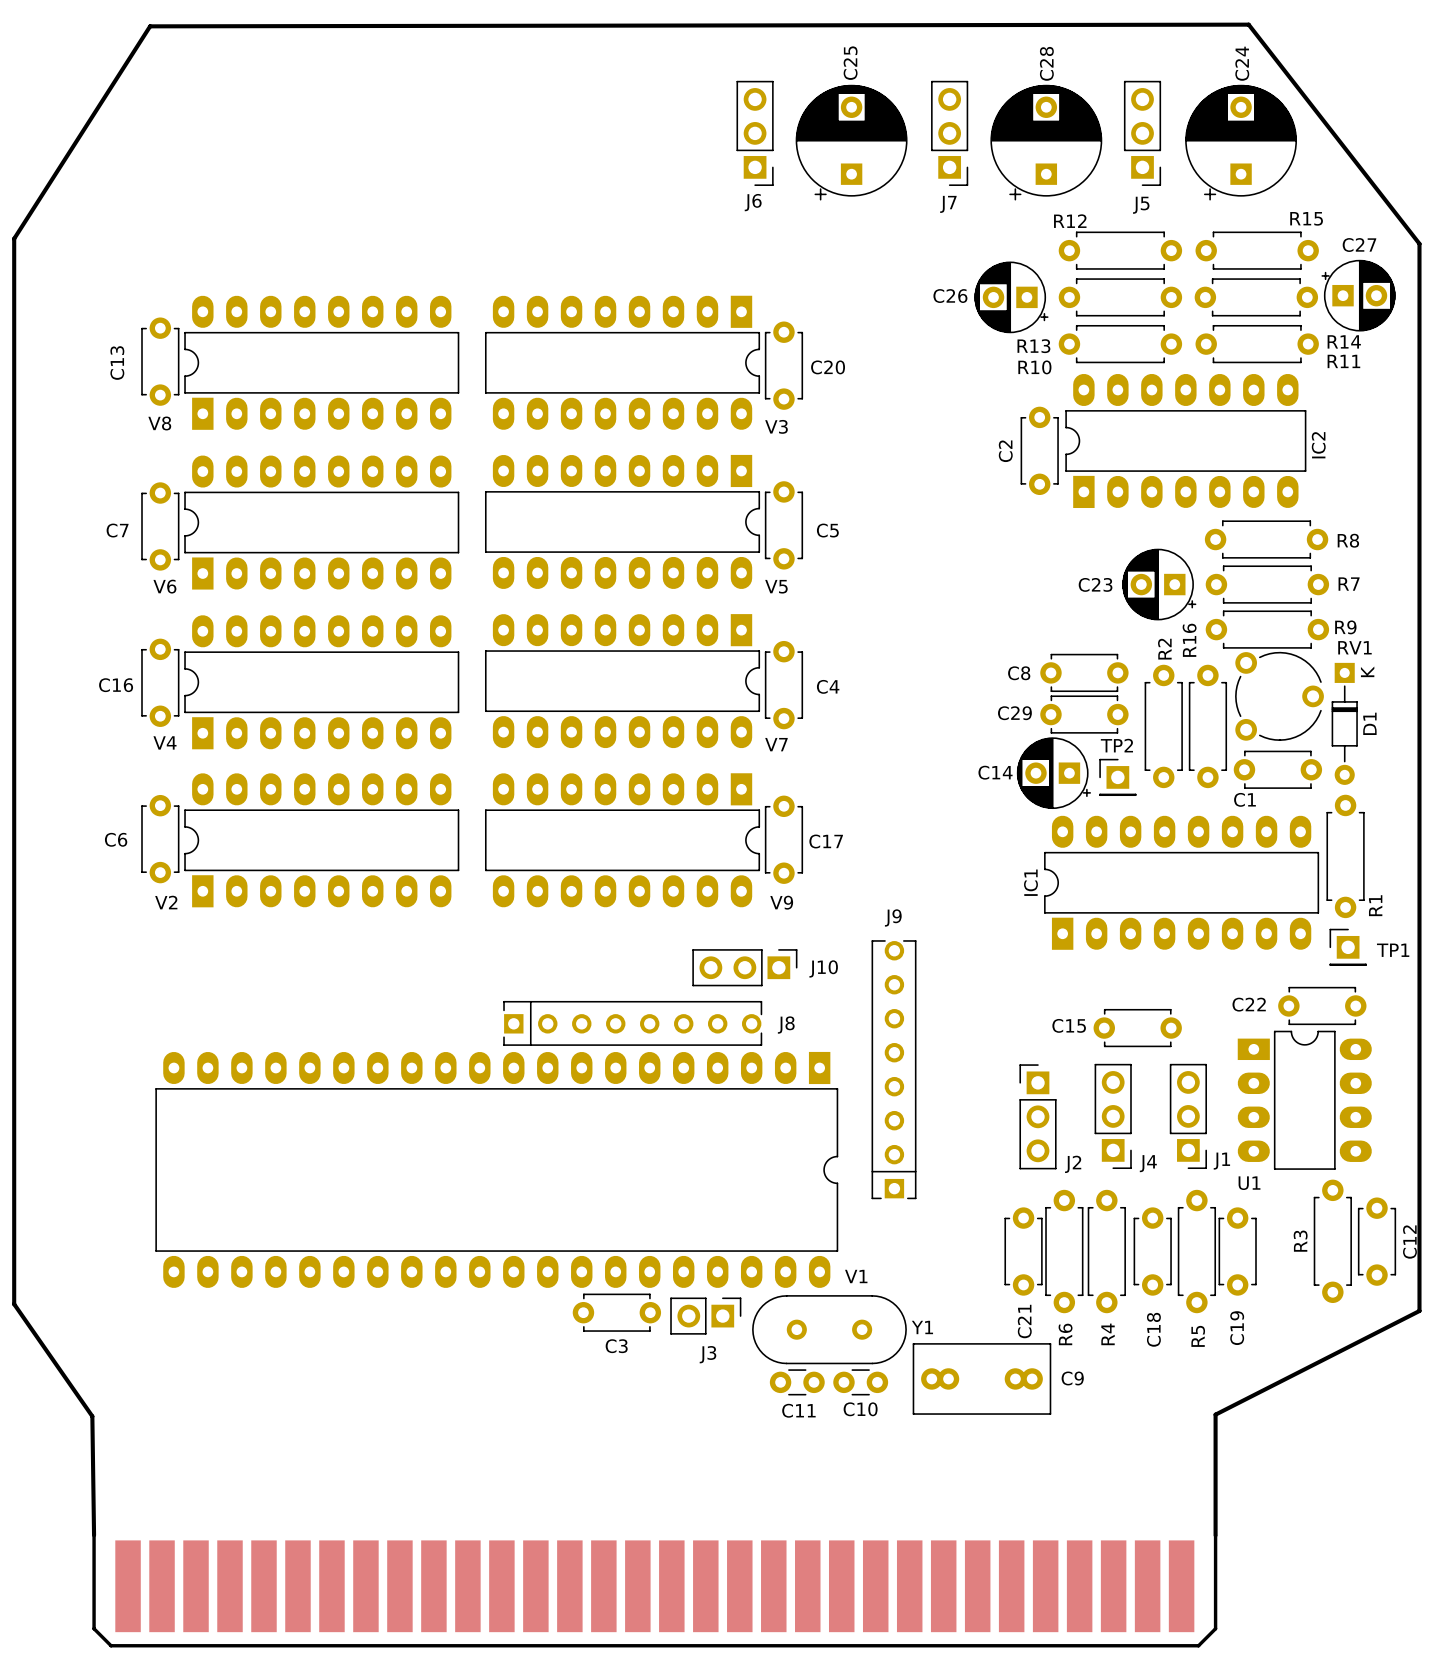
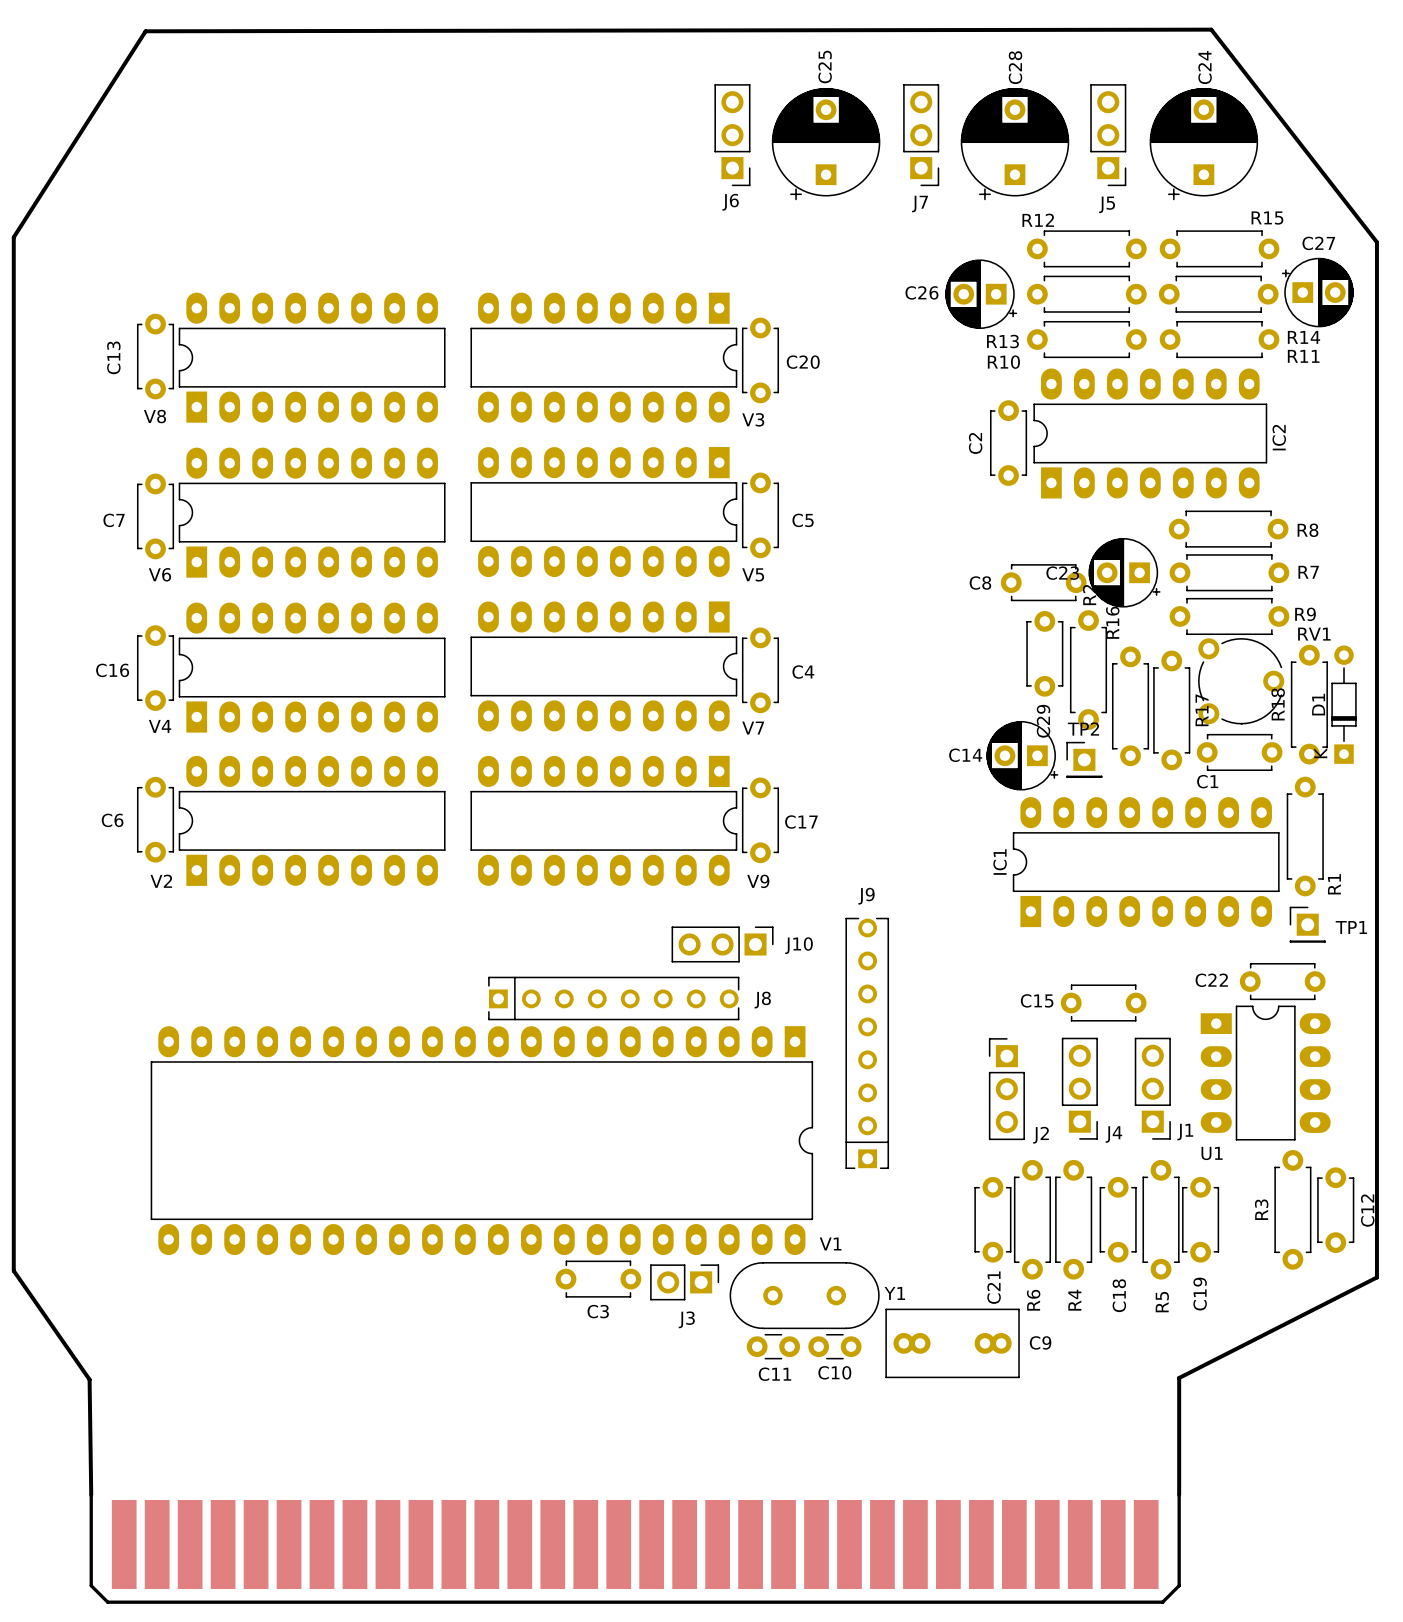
R16 name: R16 (1189, 640) -> R17 (1202, 710)
C8 position: (1084, 672) -> (1043, 582)
C29 name position: C29 (1014, 713) -> C29 (1043, 721)
C29 rotation: 0° (1084, 714) -> 90° clockwise (1044, 653)
R18: none -> (1309, 704)
R16: none -> (1130, 706)
D1 rotation: 0° (1344, 723) -> 180° (1344, 704)
R2 position: (1163, 726) -> (1088, 670)

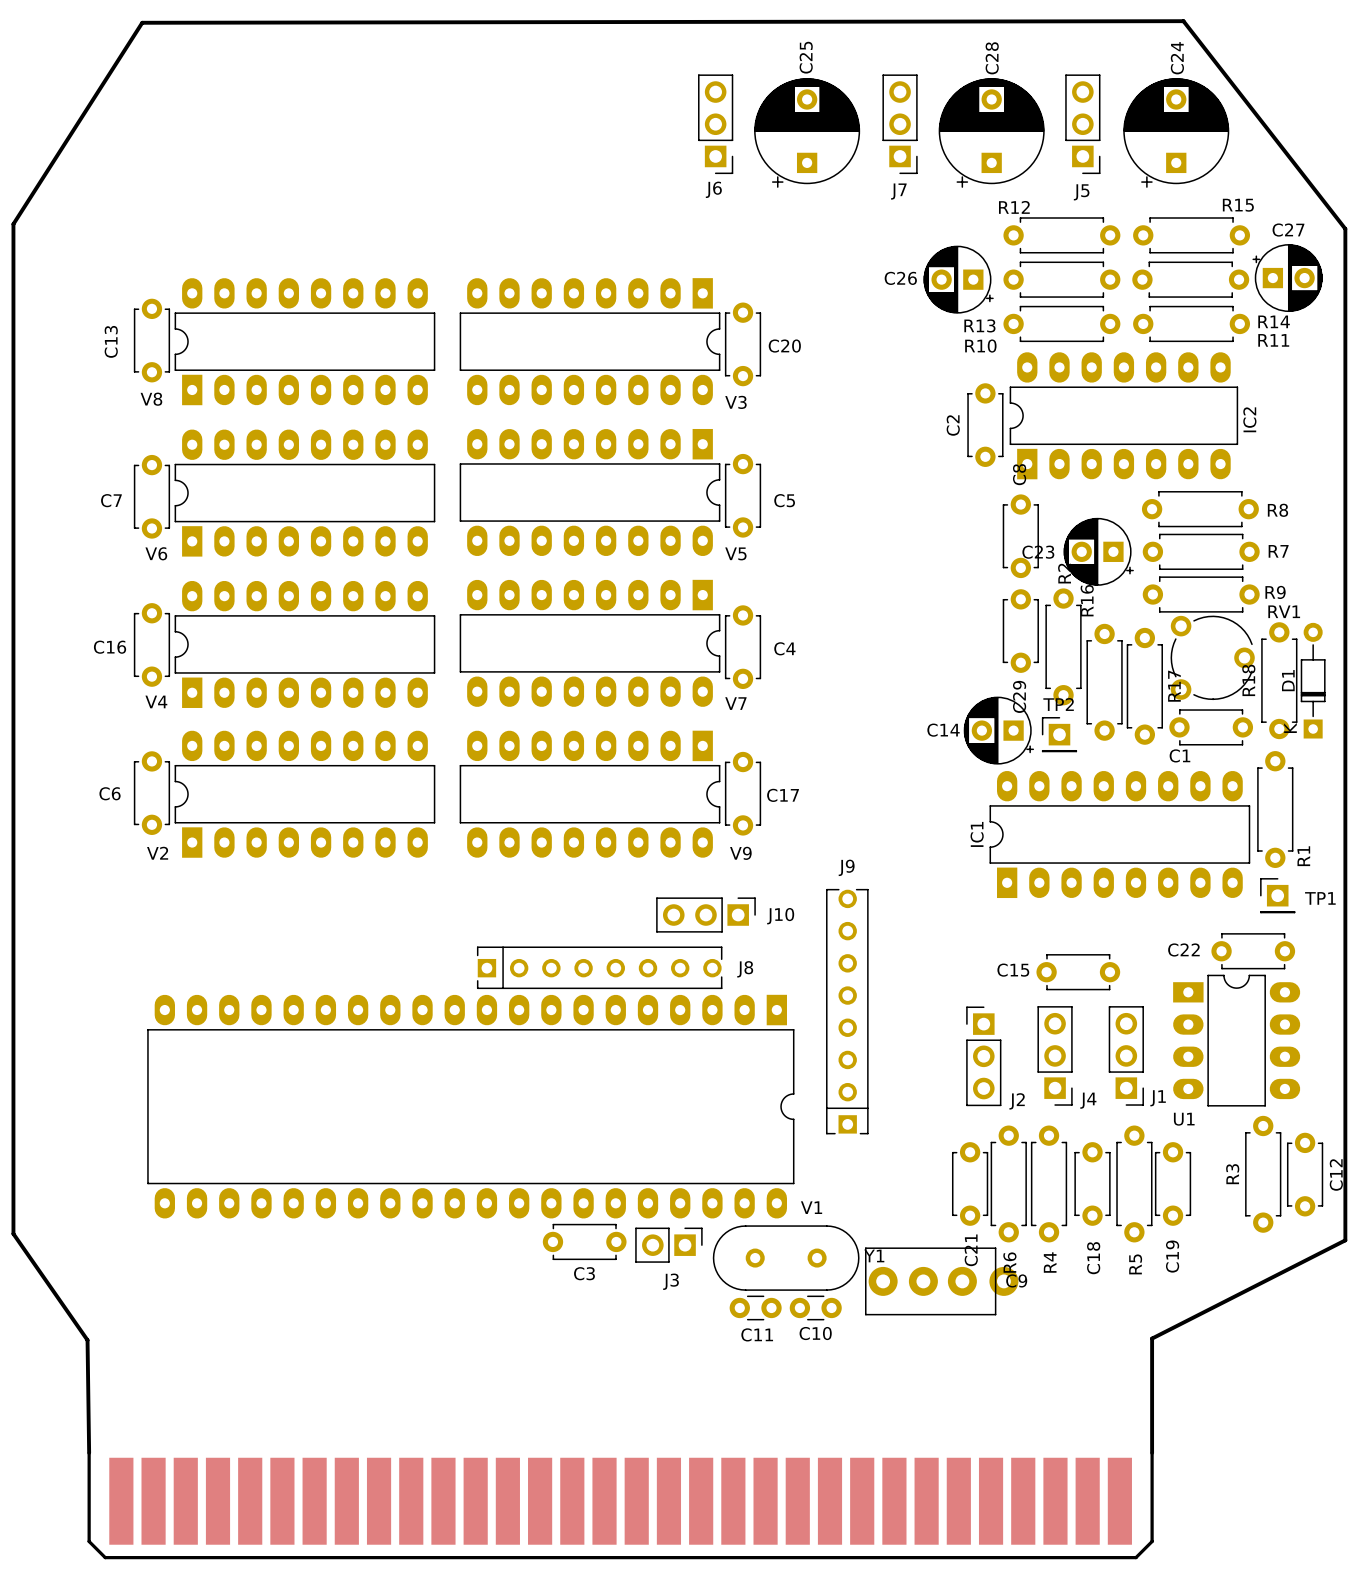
C8 rotation: 0° (1043, 582) -> 90° clockwise (1020, 536)
C9 footprint: [885, 1308, 1020, 1379] -> [865, 1247, 1019, 1316]

